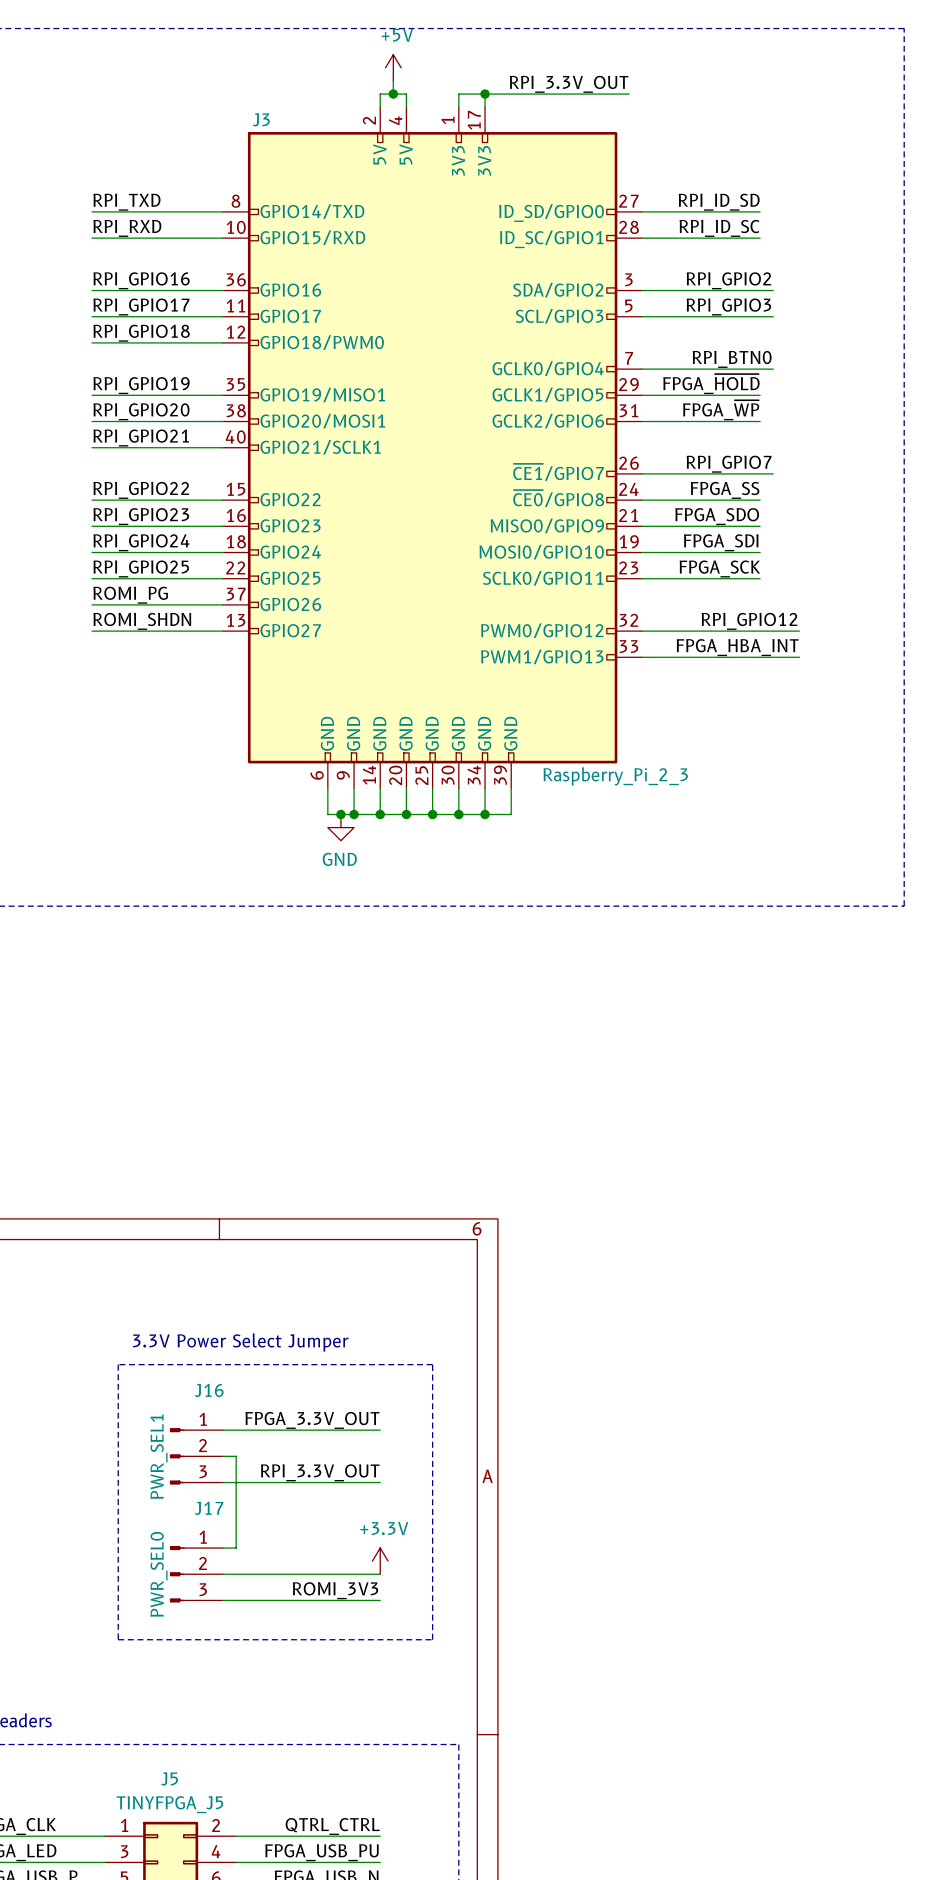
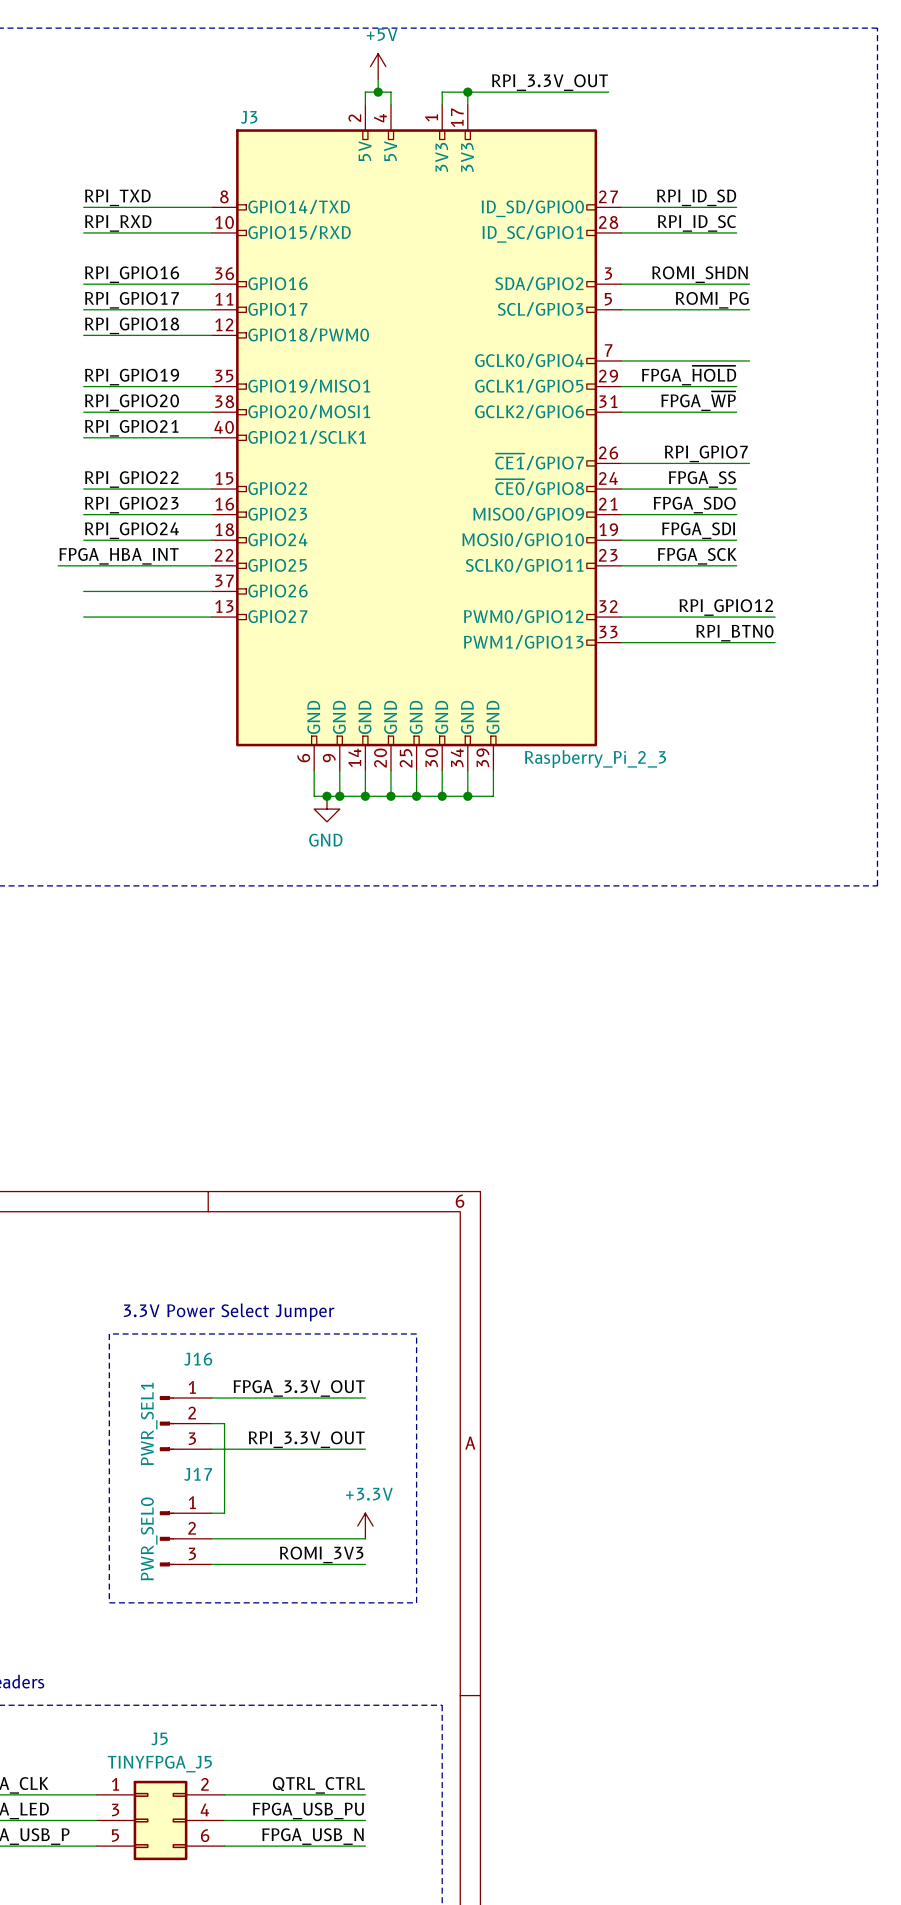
label: RPI_GPIO2 (728, 280) -> ROMI_SHDN (699, 274)
label: RPI_GPIO3 (728, 306) -> ROMI_PG (712, 300)
label: RPI_BTN0 (732, 359) -> none
label: none -> FPGA_HBA_INT (119, 556)
label: RPI_GPIO25 (141, 568) -> none
wire: none -> (58, 565) (83, 565)
label: ROMI_PG (130, 595) -> none
label: ROMI_SHDN (142, 621) -> none
label: FPGA_HBA_INT (737, 647) -> RPI_BTN0 (734, 633)

